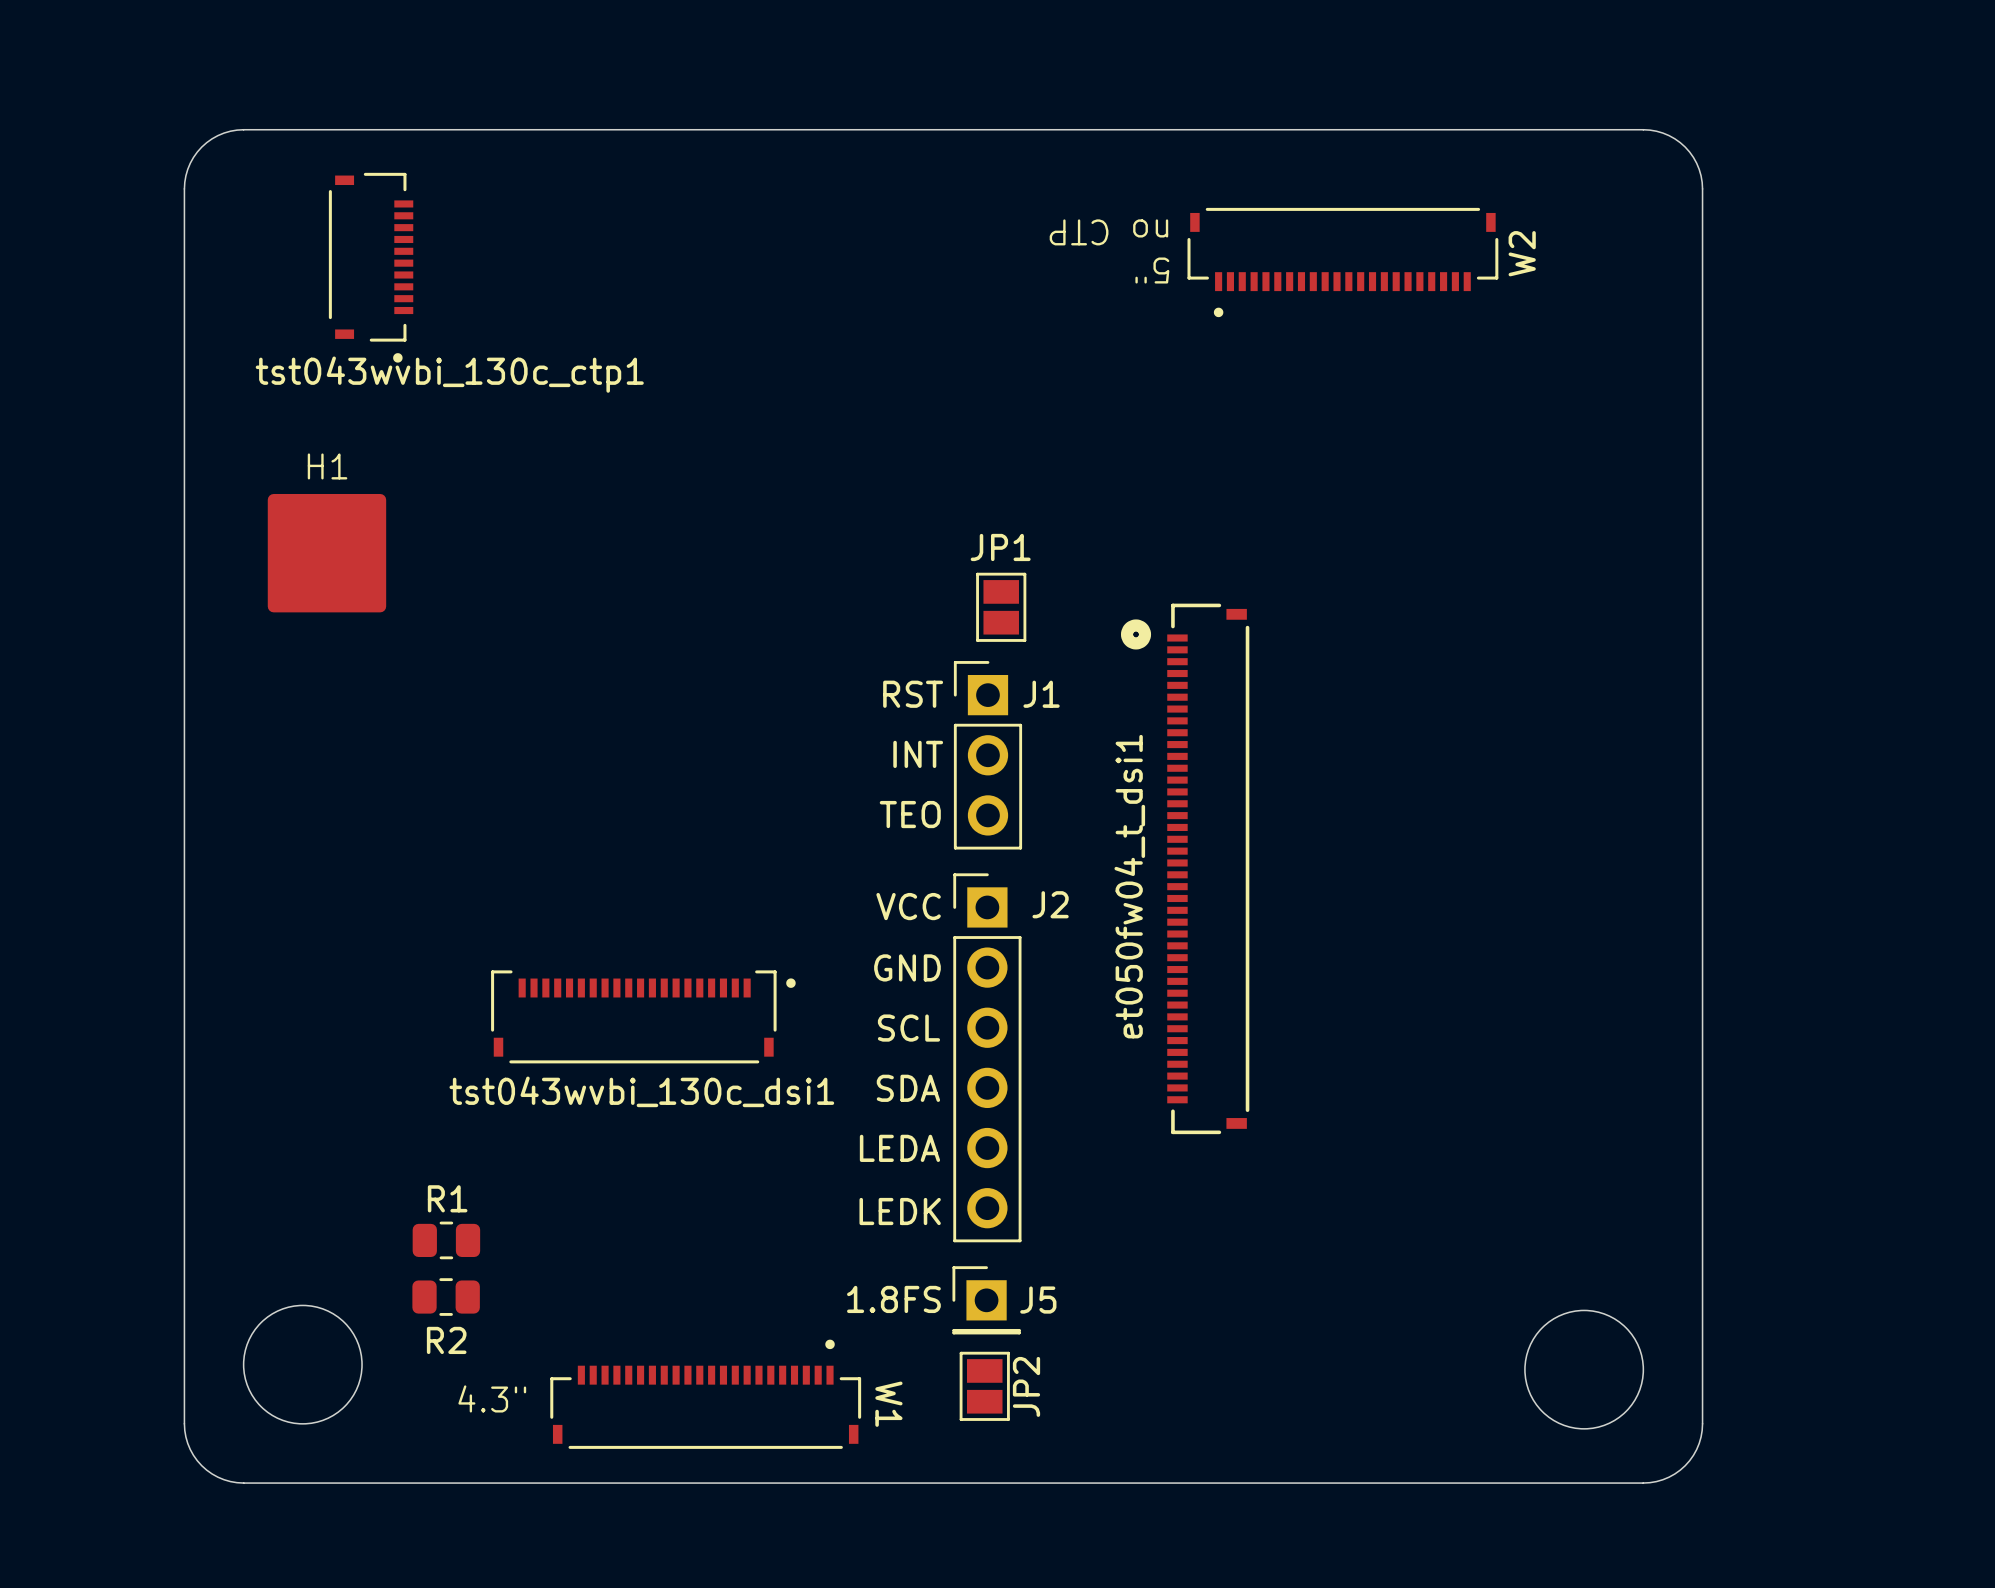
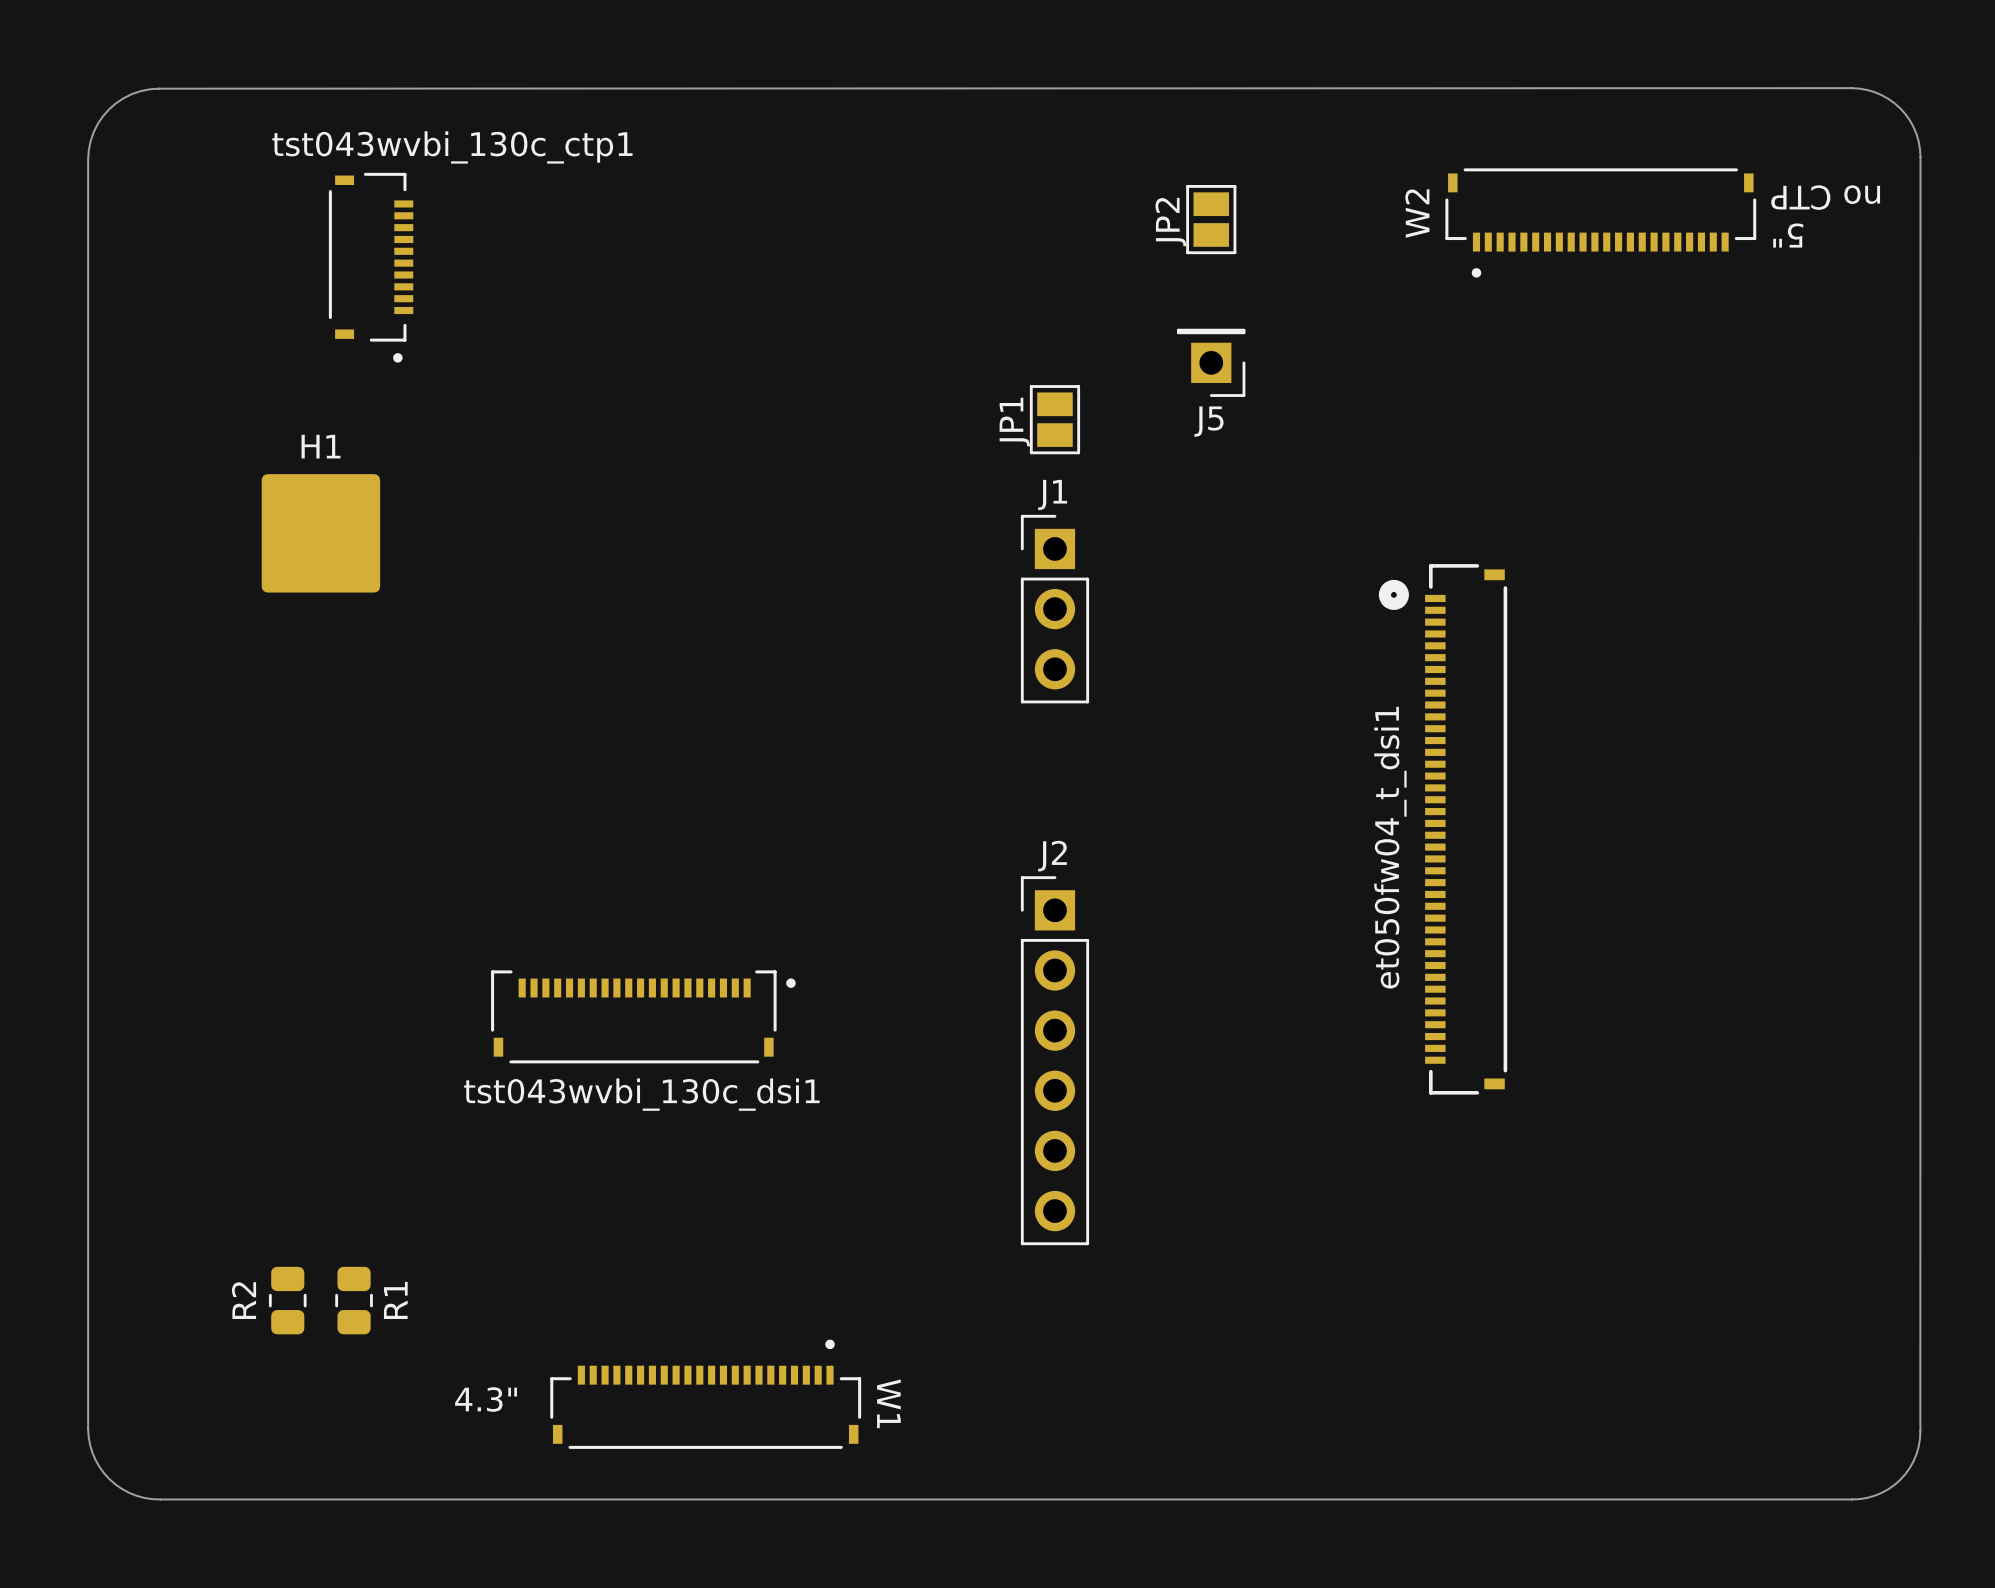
board edge: (243, 129) (1643, 129) (1669, 135) (1685, 147) (1699, 169) (1702, 188) (1702, 1423) (1699, 1443) (1685, 1465) (1669, 1477) (1643, 1483) (243, 1483) (224, 1479) (201, 1465) (187, 1443) (184, 1423) (184, 188) (187, 169) (201, 147) (217, 135) (243, 129) -> (1920, 1431) (1920, 157) (1918, 141) (1913, 127) (1905, 114) (1894, 103) (1874, 92) (1851, 88) (159, 88) (132, 94) (115, 103) (102, 116) (90, 141) (88, 159) (88, 1428) (89, 1444) (95, 1459) (103, 1473) (115, 1484) (136, 1495) (160, 1499) (1852, 1499) (1874, 1495) (1888, 1489) (1900, 1479) (1913, 1461) (1918, 1446) (1920, 1431)
text: none -> no CTP (1825, 197)
text: no CTP (1108, 232) -> none
text: none -> 5" (1788, 235)
W2 name position: W2 (1522, 253) -> W2 (1417, 213)
W2 position: (1342, 262) -> (1600, 222)
text: 5" (1152, 270) -> none
tst043wvbi_130c_ctp1 name position: tst043wvbi_130c_ctp1 (449, 374) -> tst043wvbi_130c_ctp1 (452, 147)
JP1 name rotation: 0° (1000, 547) -> 90° counterclockwise (1014, 422)
H1 position: (326, 553) -> (320, 533)
JP1 position: (1001, 607) -> (1054, 419)
text: RST (913, 694) -> none
J1 name position: J1 (1041, 694) -> J1 (1052, 494)
text: INT (918, 754) -> none
J1 position: (987, 755) -> (1054, 609)
text: TEO (910, 814) -> none
et050fw04_t_dsi1 position: (1185, 868) -> (1443, 829)
J2 name position: J2 (1050, 904) -> J2 (1052, 856)
text: VCC (908, 906) -> none
text: GND (907, 967) -> none
text: SCL (908, 1028) -> none
J2 position: (987, 1057) -> (1054, 1060)
text: SDA (908, 1088) -> none
text: LEDA (899, 1148) -> none
text: LEDK (900, 1211) -> none
R1 rotation: 0° (446, 1240) -> 90° clockwise (354, 1300)
R1 position: (446, 1240) -> (354, 1300)
R2 rotation: 0° (446, 1297) -> 90° clockwise (287, 1300)
R2 position: (446, 1297) -> (287, 1300)
text: 1.8FS (893, 1299) -> none
J5 rotation: 0° (986, 1300) -> 180° (1211, 362)
J5 position: (986, 1300) -> (1211, 362)
J5 name position: J5 (1038, 1300) -> J5 (1209, 421)
round board edge: [243, 1304, 363, 1425] -> none
round board edge: [1524, 1309, 1644, 1430] -> none
JP2 position: (984, 1386) -> (1211, 219)
JP2 name position: JP2 (1026, 1386) -> JP2 (1170, 222)

